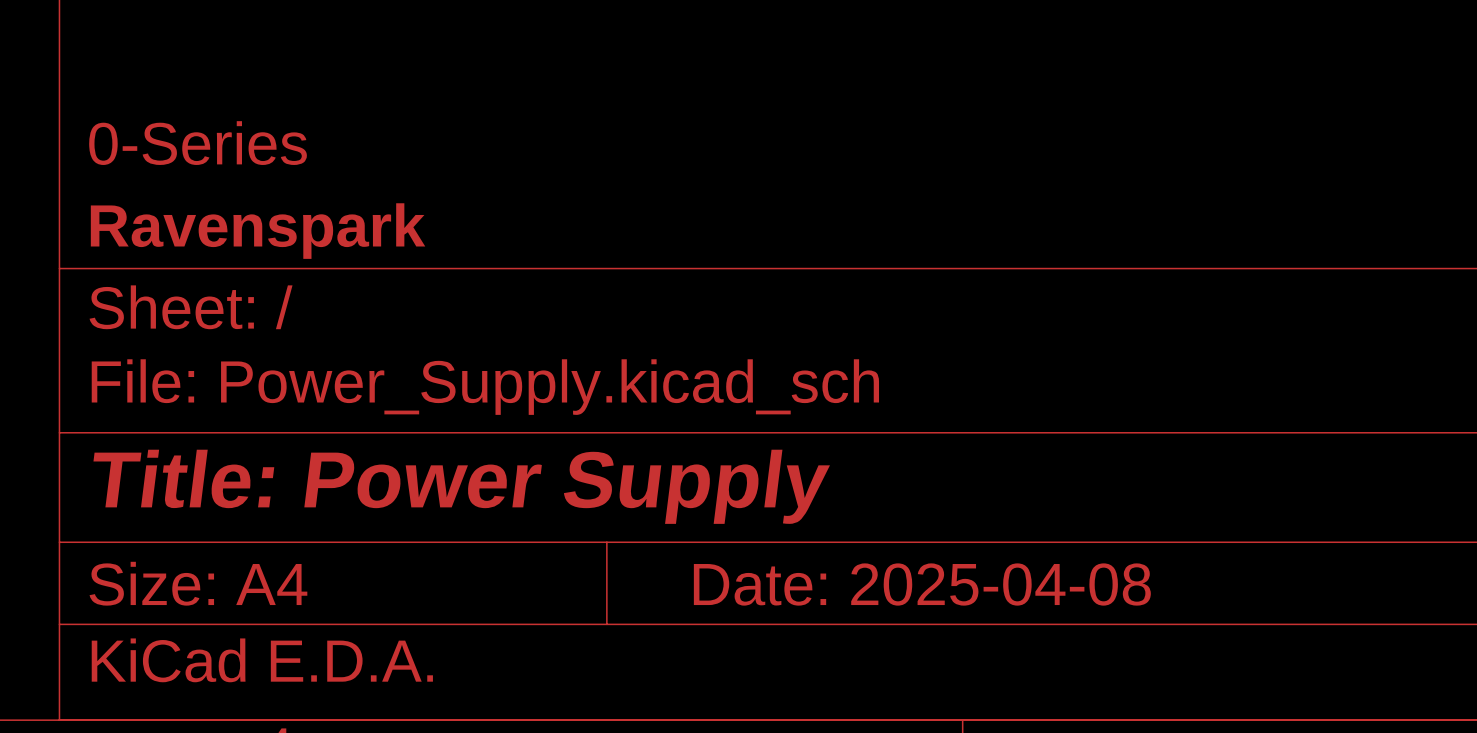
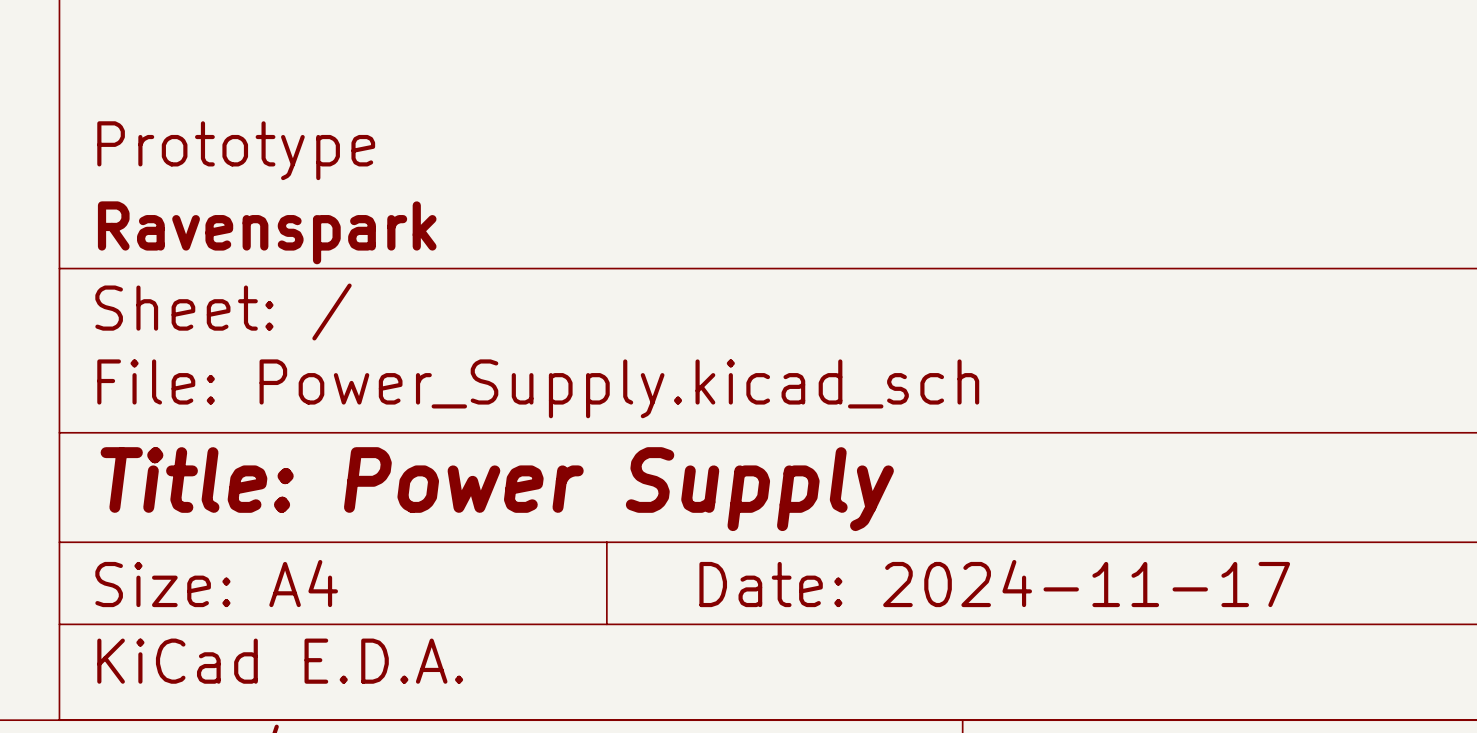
title block: 0-Series (198, 143) -> Prototype (236, 150)
title block: Date: 2025-04-08 (922, 584) -> Date: 2024-11-17 (994, 583)

